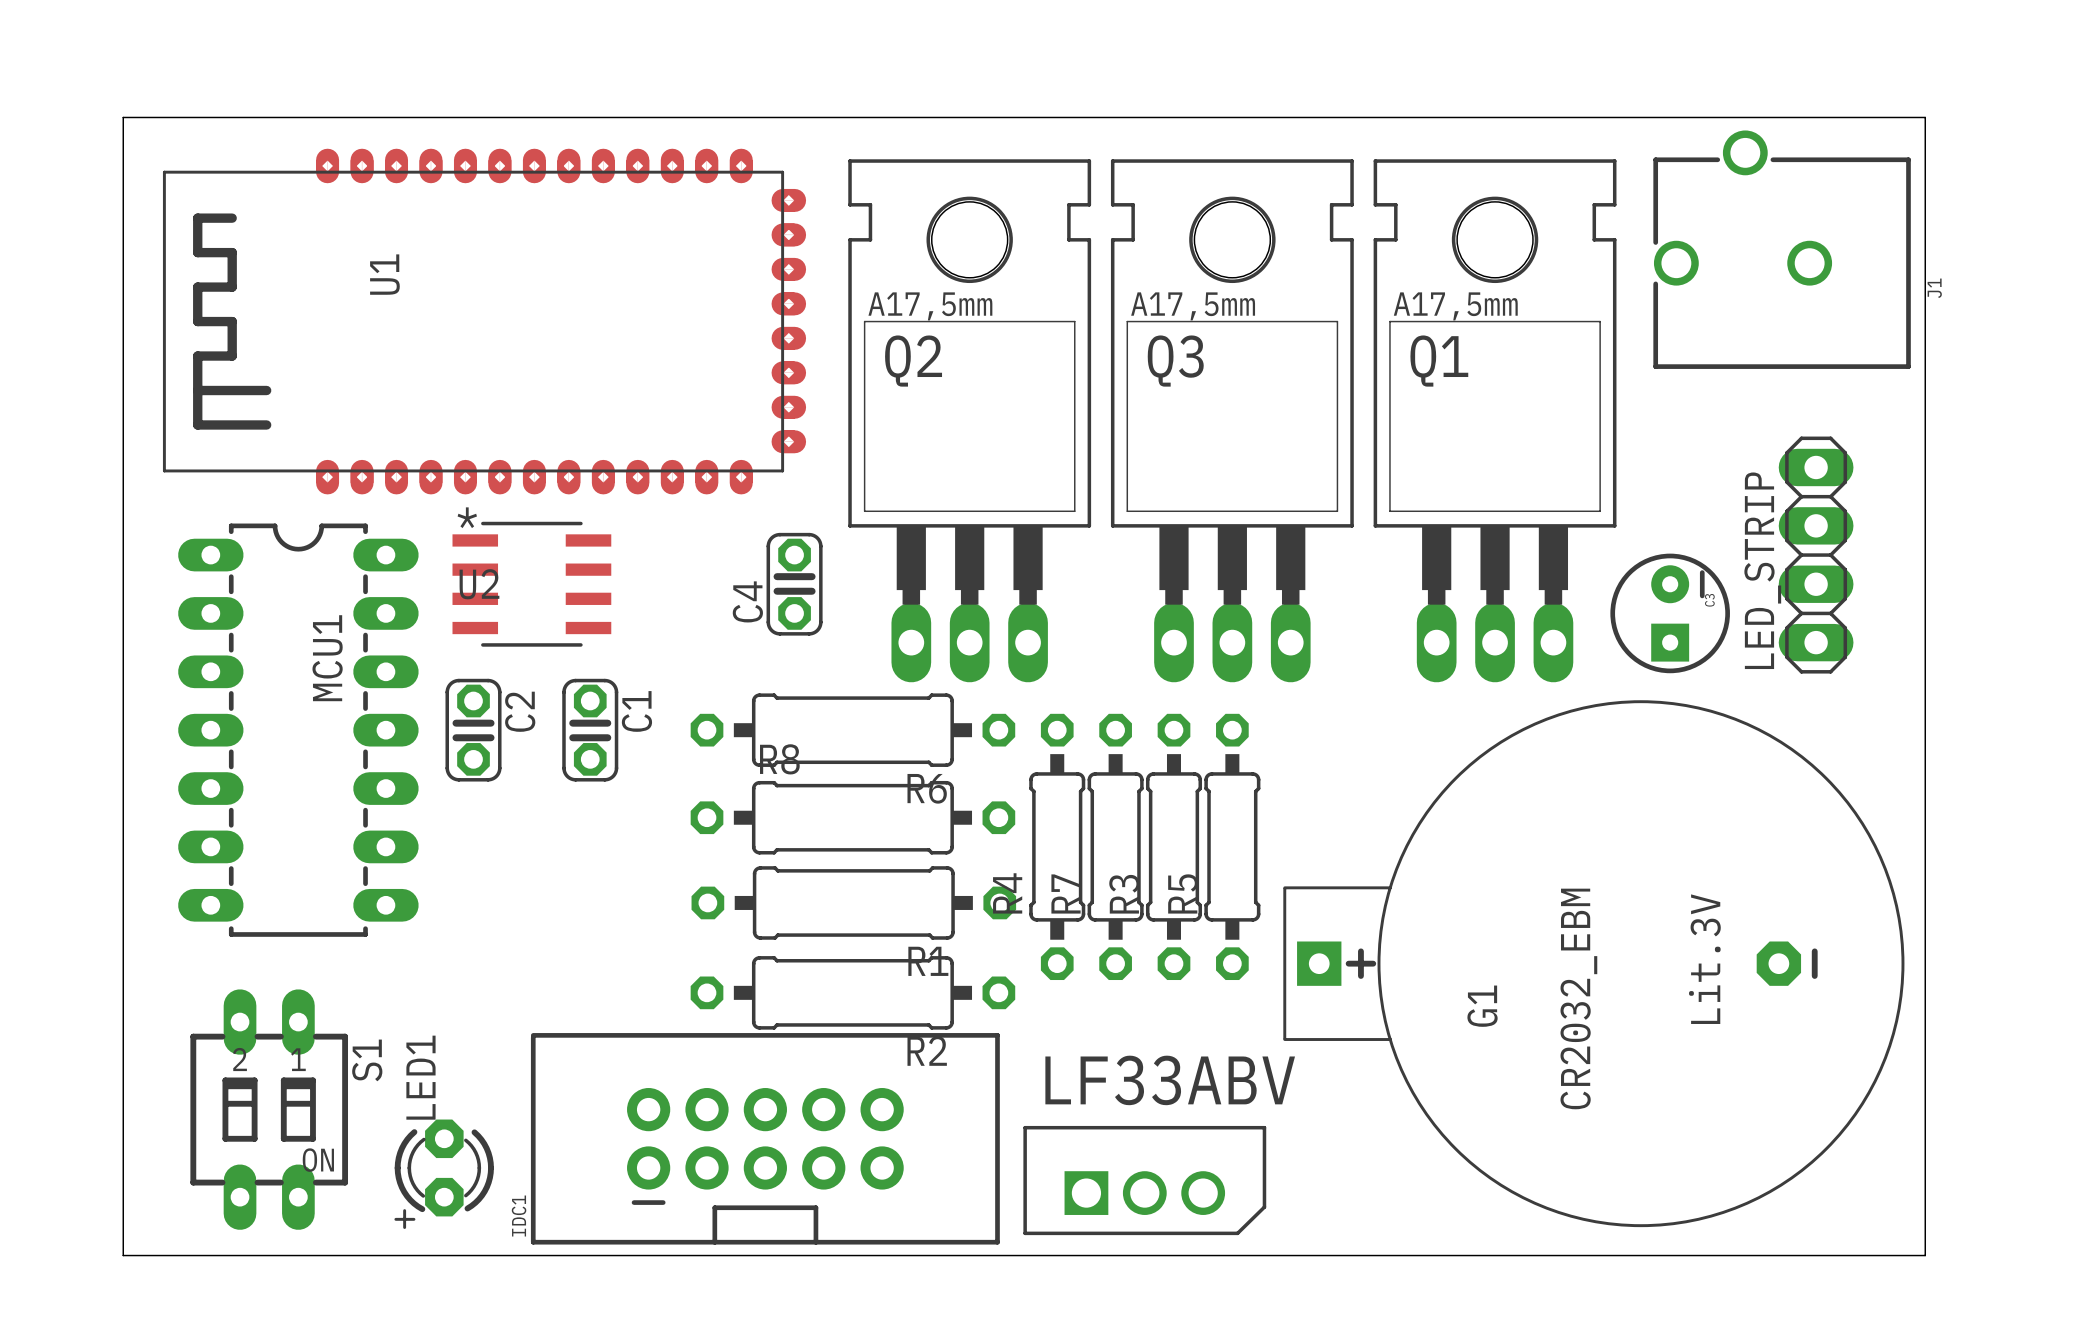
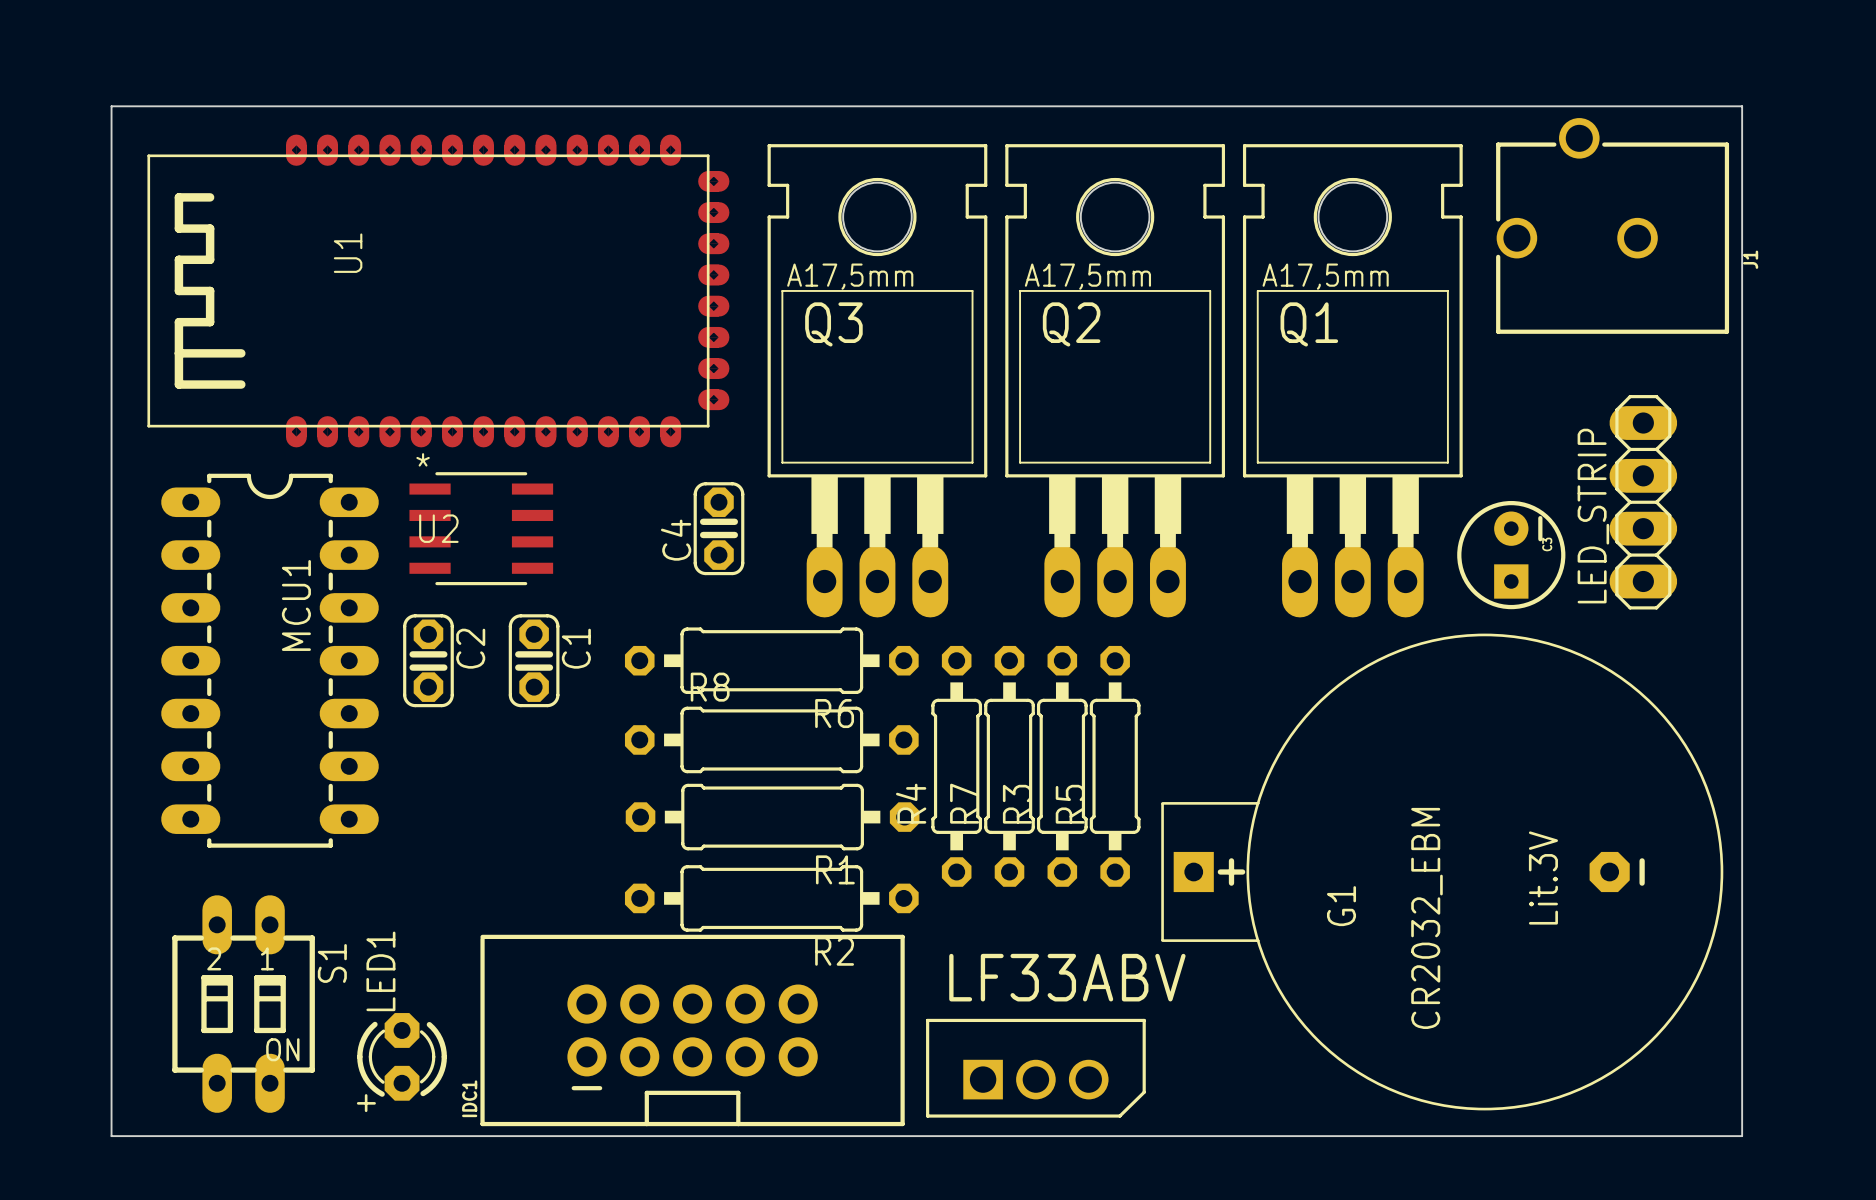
Q2 name: Q2 (913, 361) -> Q3 (833, 324)
Q3 name: Q3 (1175, 361) -> Q2 (1071, 324)

